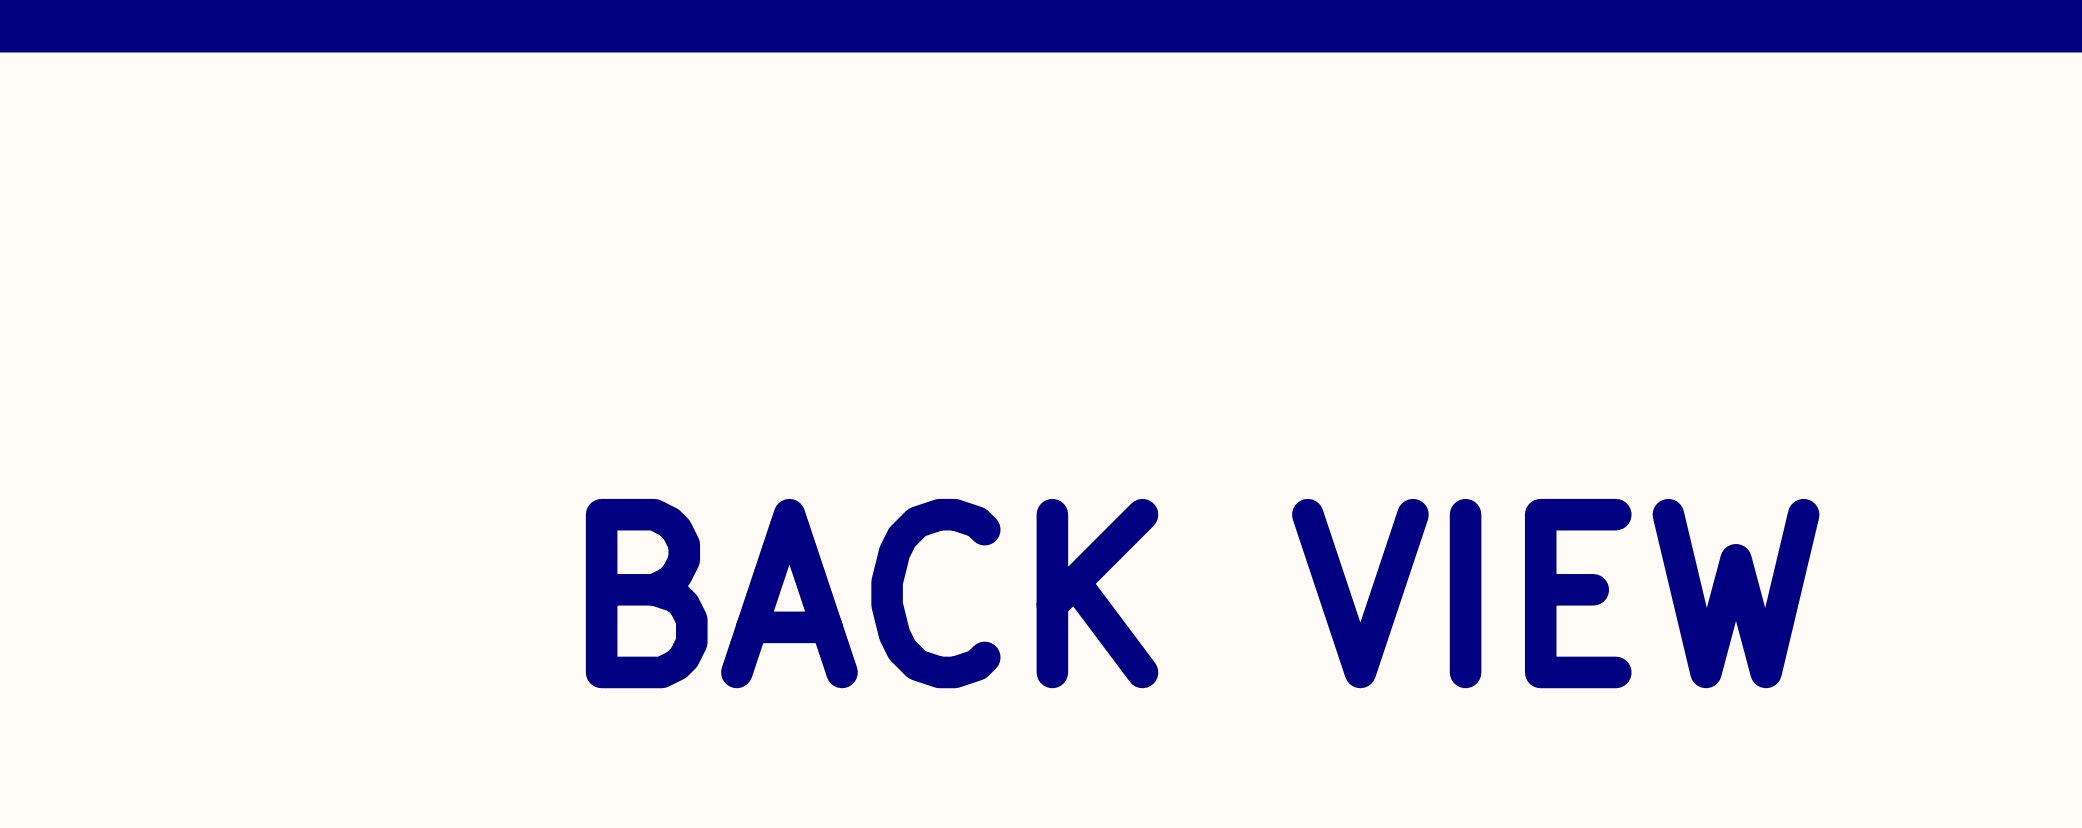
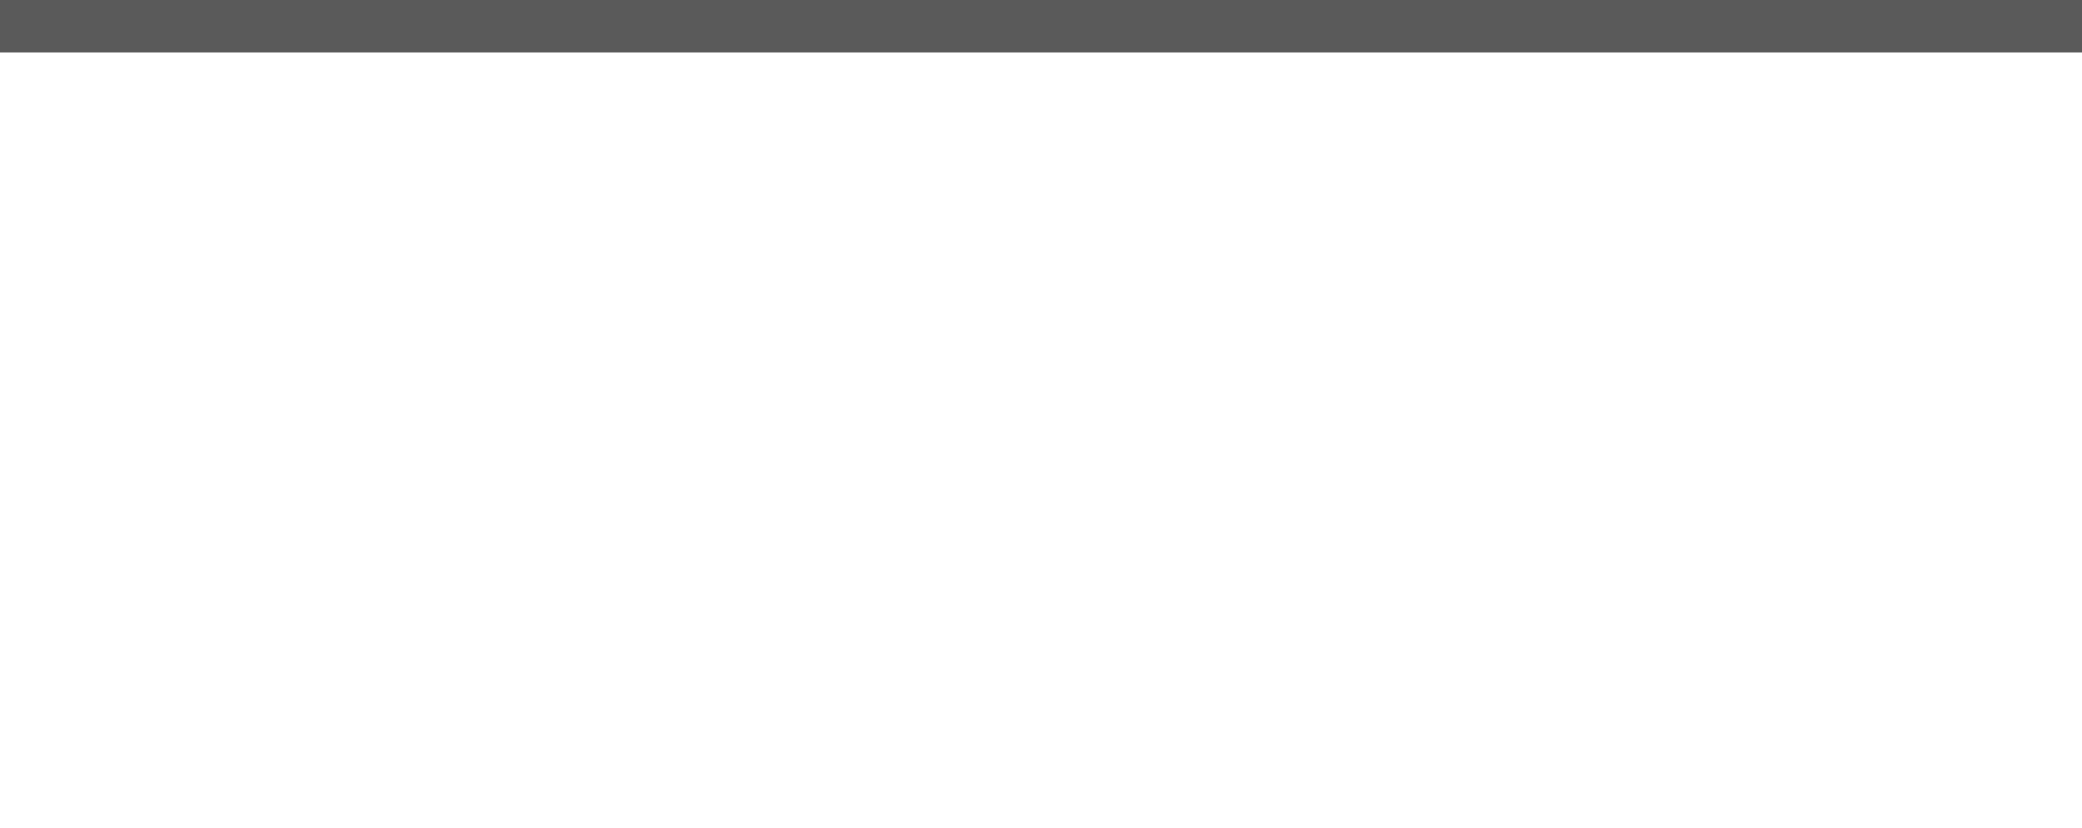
text: BACK VIEW (1202, 593) -> none

